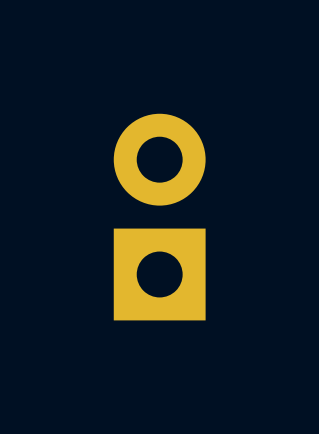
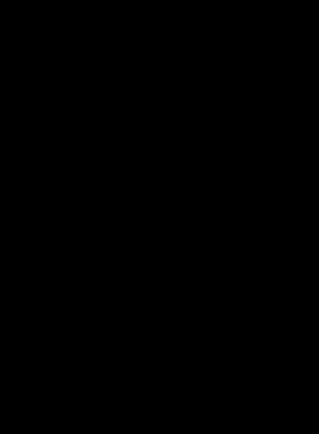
part: (159, 217) -> none

